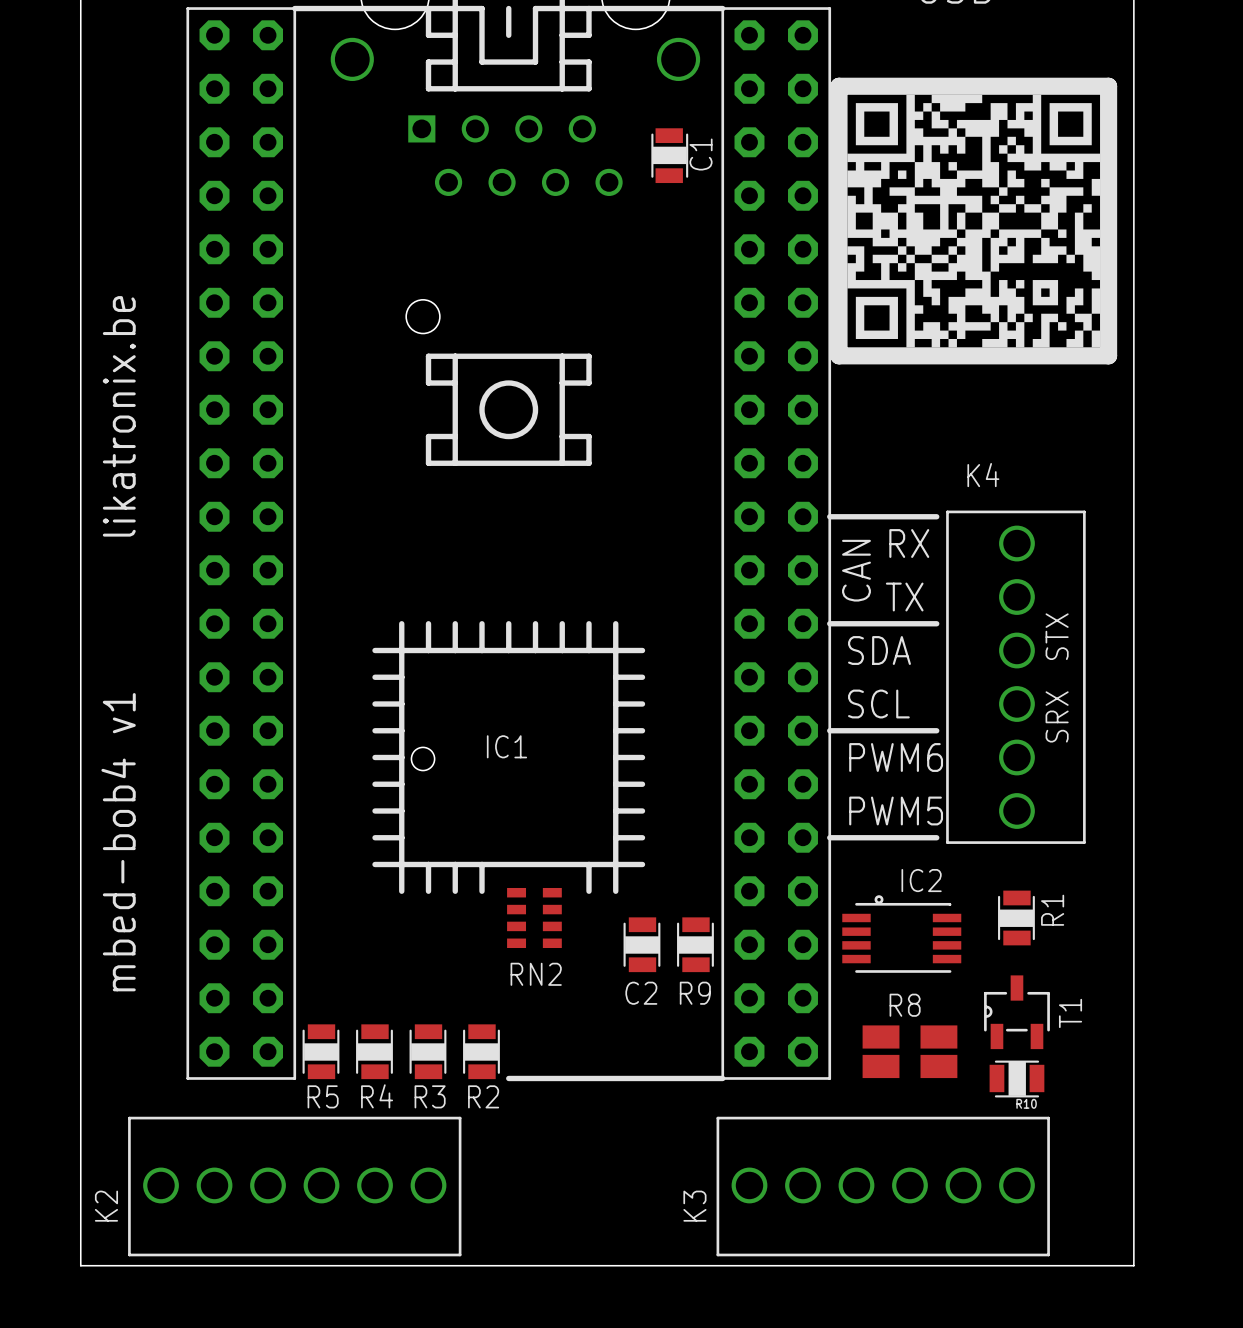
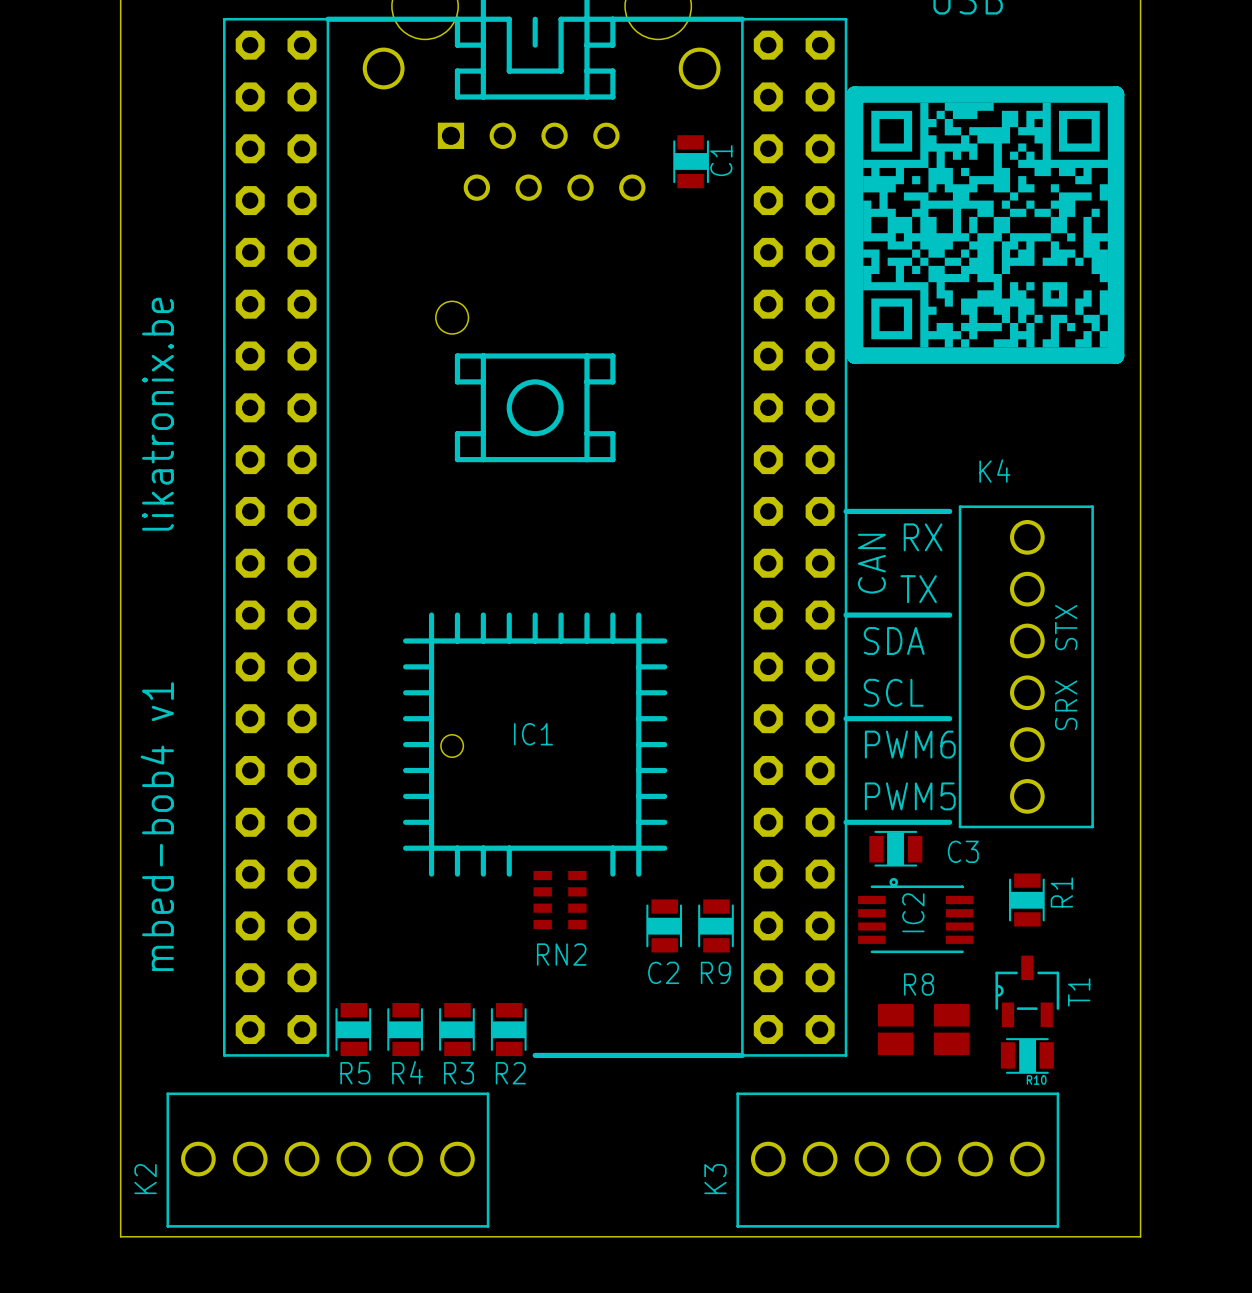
C3: none -> (895, 848)
IC2 name rotation: 0° (921, 880) -> 90° counterclockwise (913, 912)

